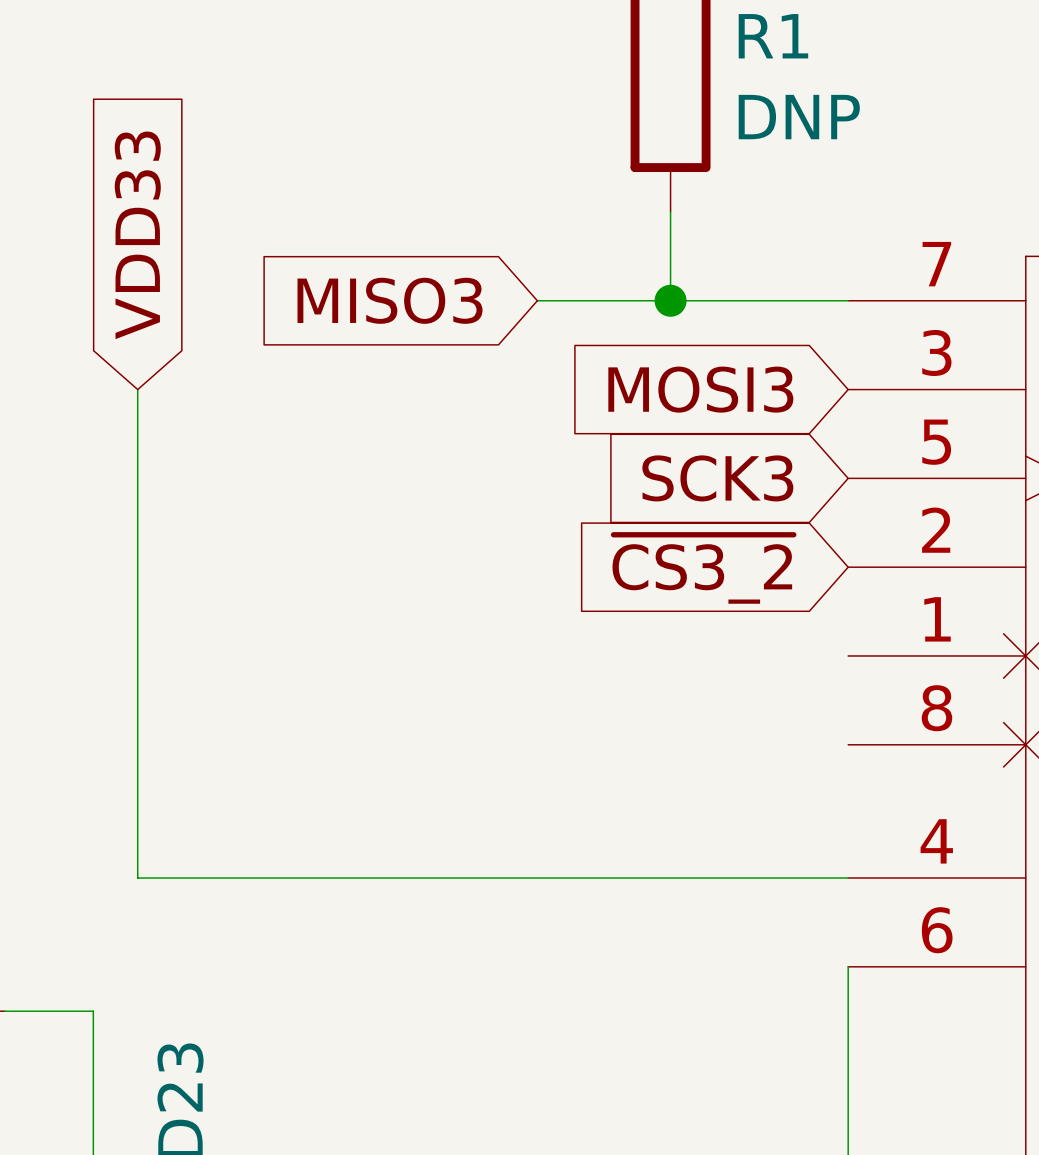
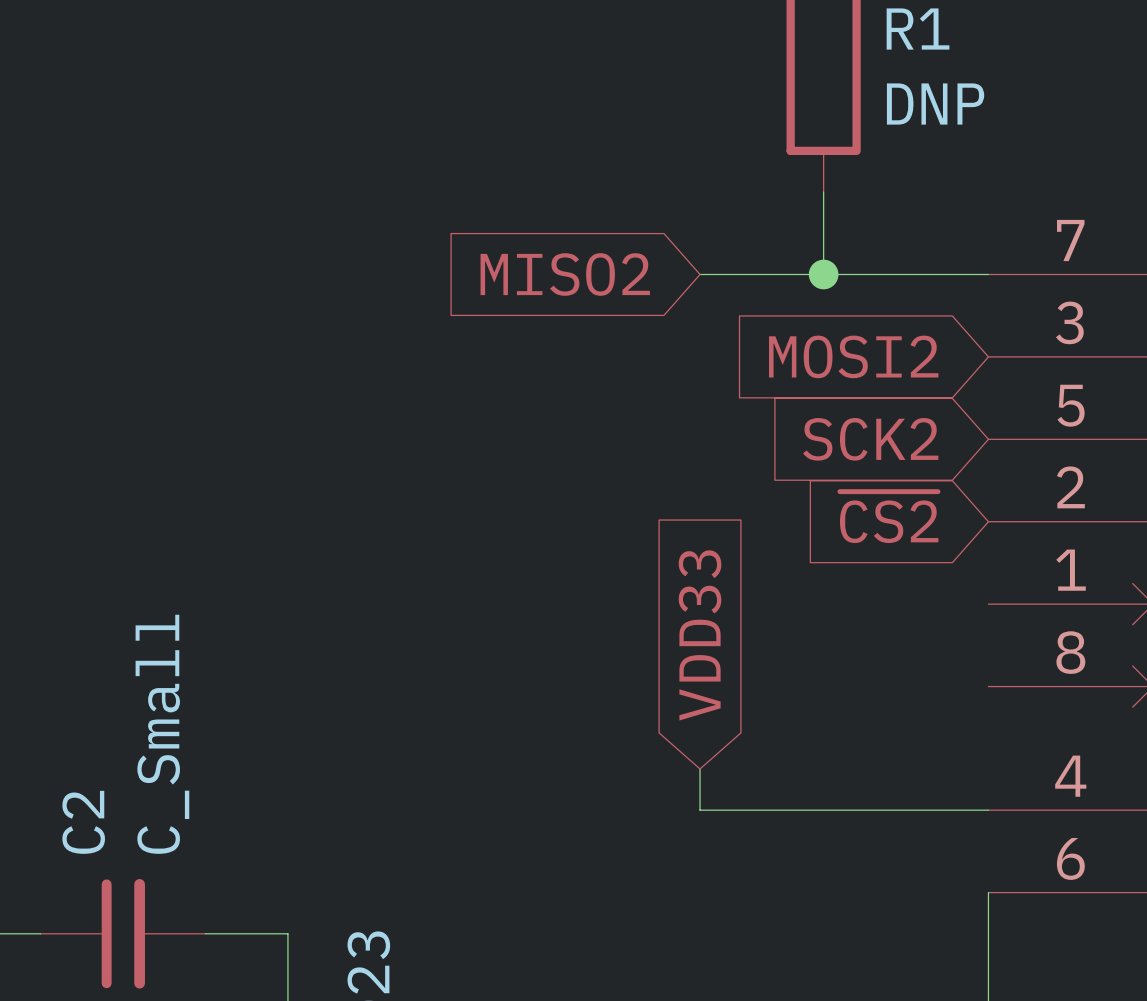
global label position: VDD33 (137, 235) -> VDD33 (700, 635)
global label: MISO3 (390, 300) -> MISO2 (565, 274)
wire: (137, 389) (137, 878) (537, 878) -> (700, 768) (700, 810)
global label: MOSI3 (700, 389) -> MOSI2 (853, 356)
global label: SCK3 (717, 478) -> SCK2 (870, 439)
global label: ~{CS3_2} (703, 569) -> ~{CS2} (889, 517)

